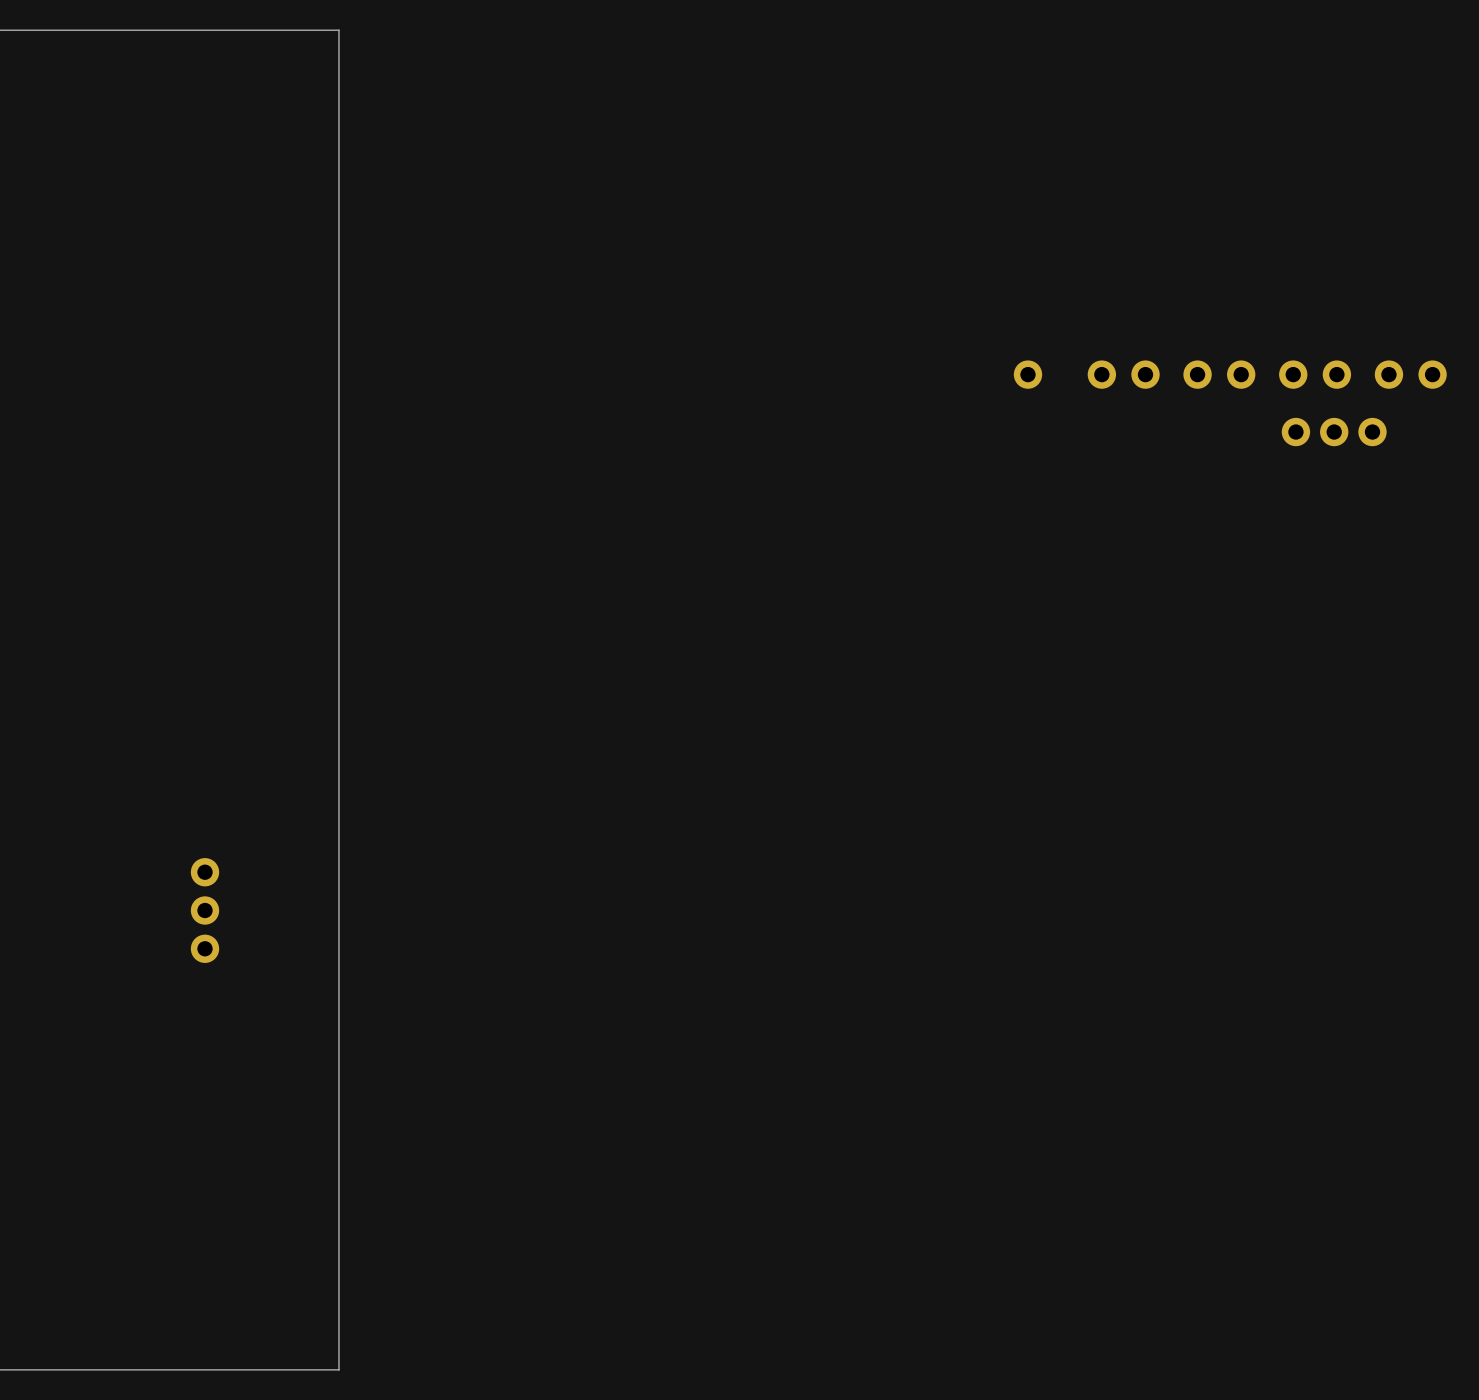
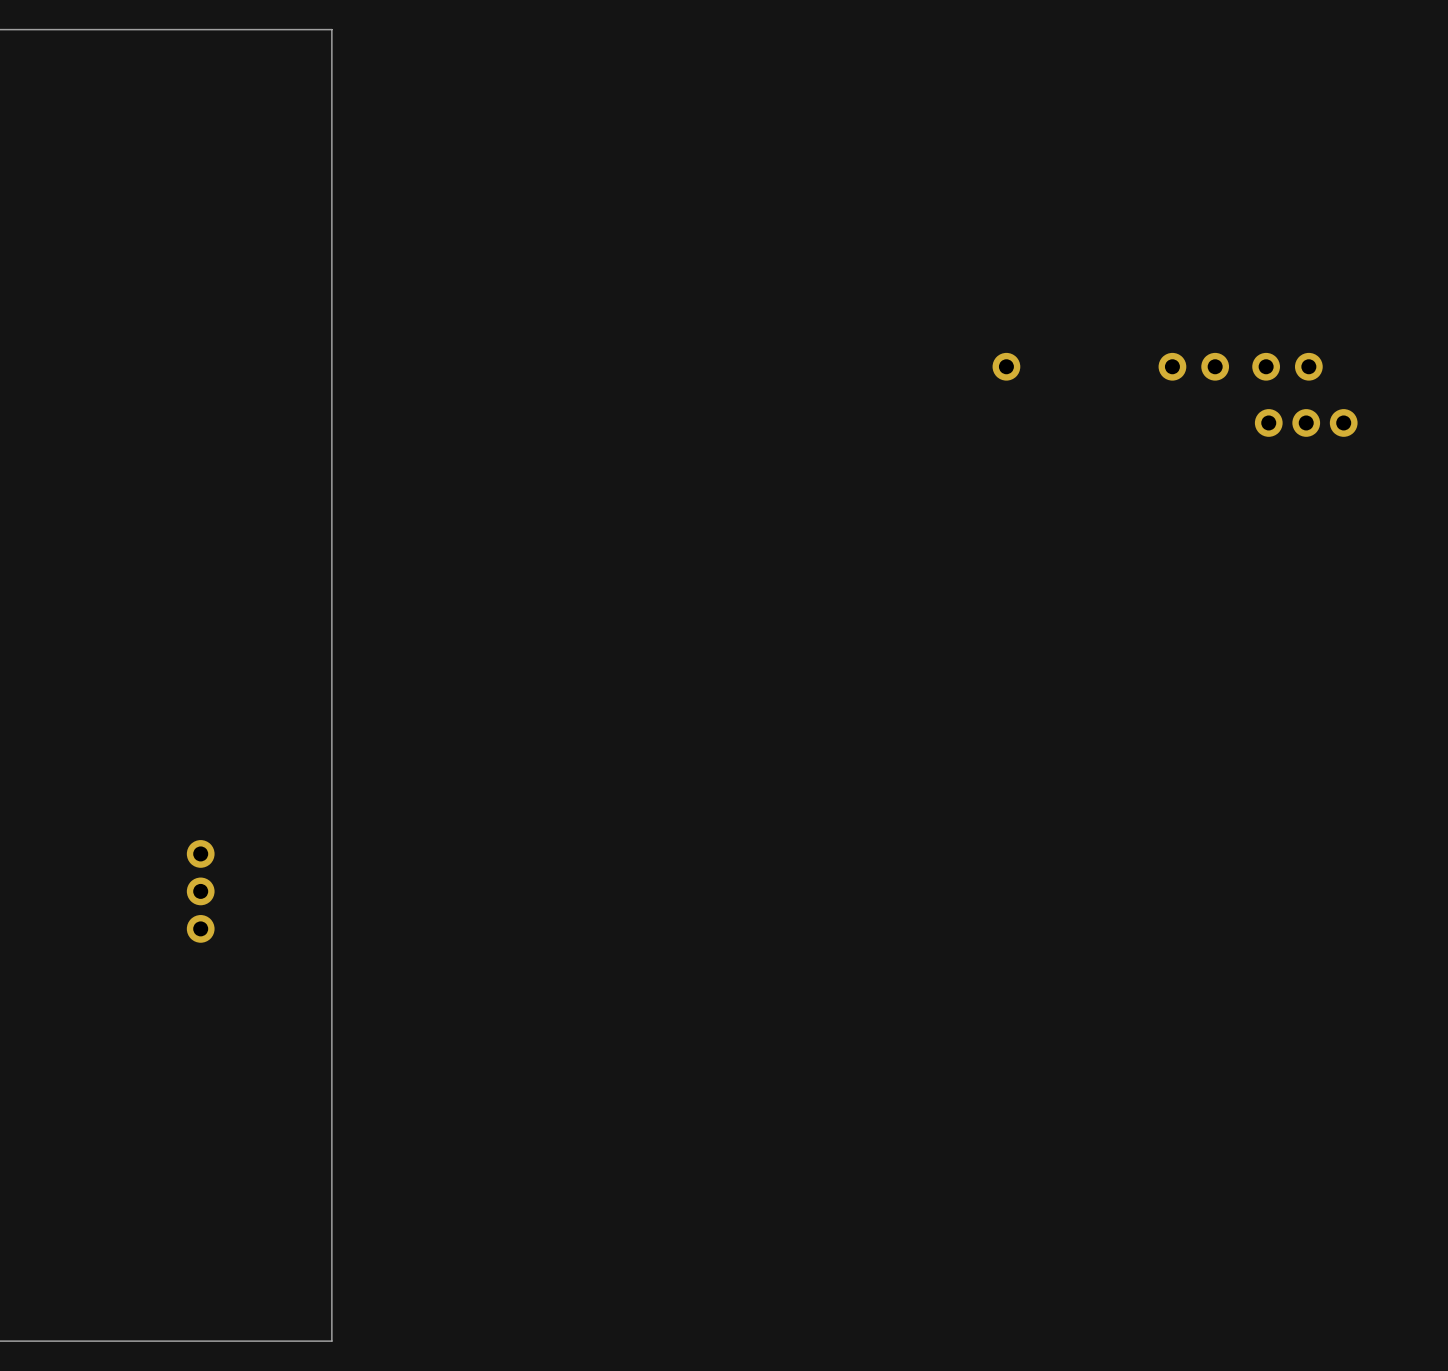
part: (1123, 374) -> none
part: (1410, 374) -> none

